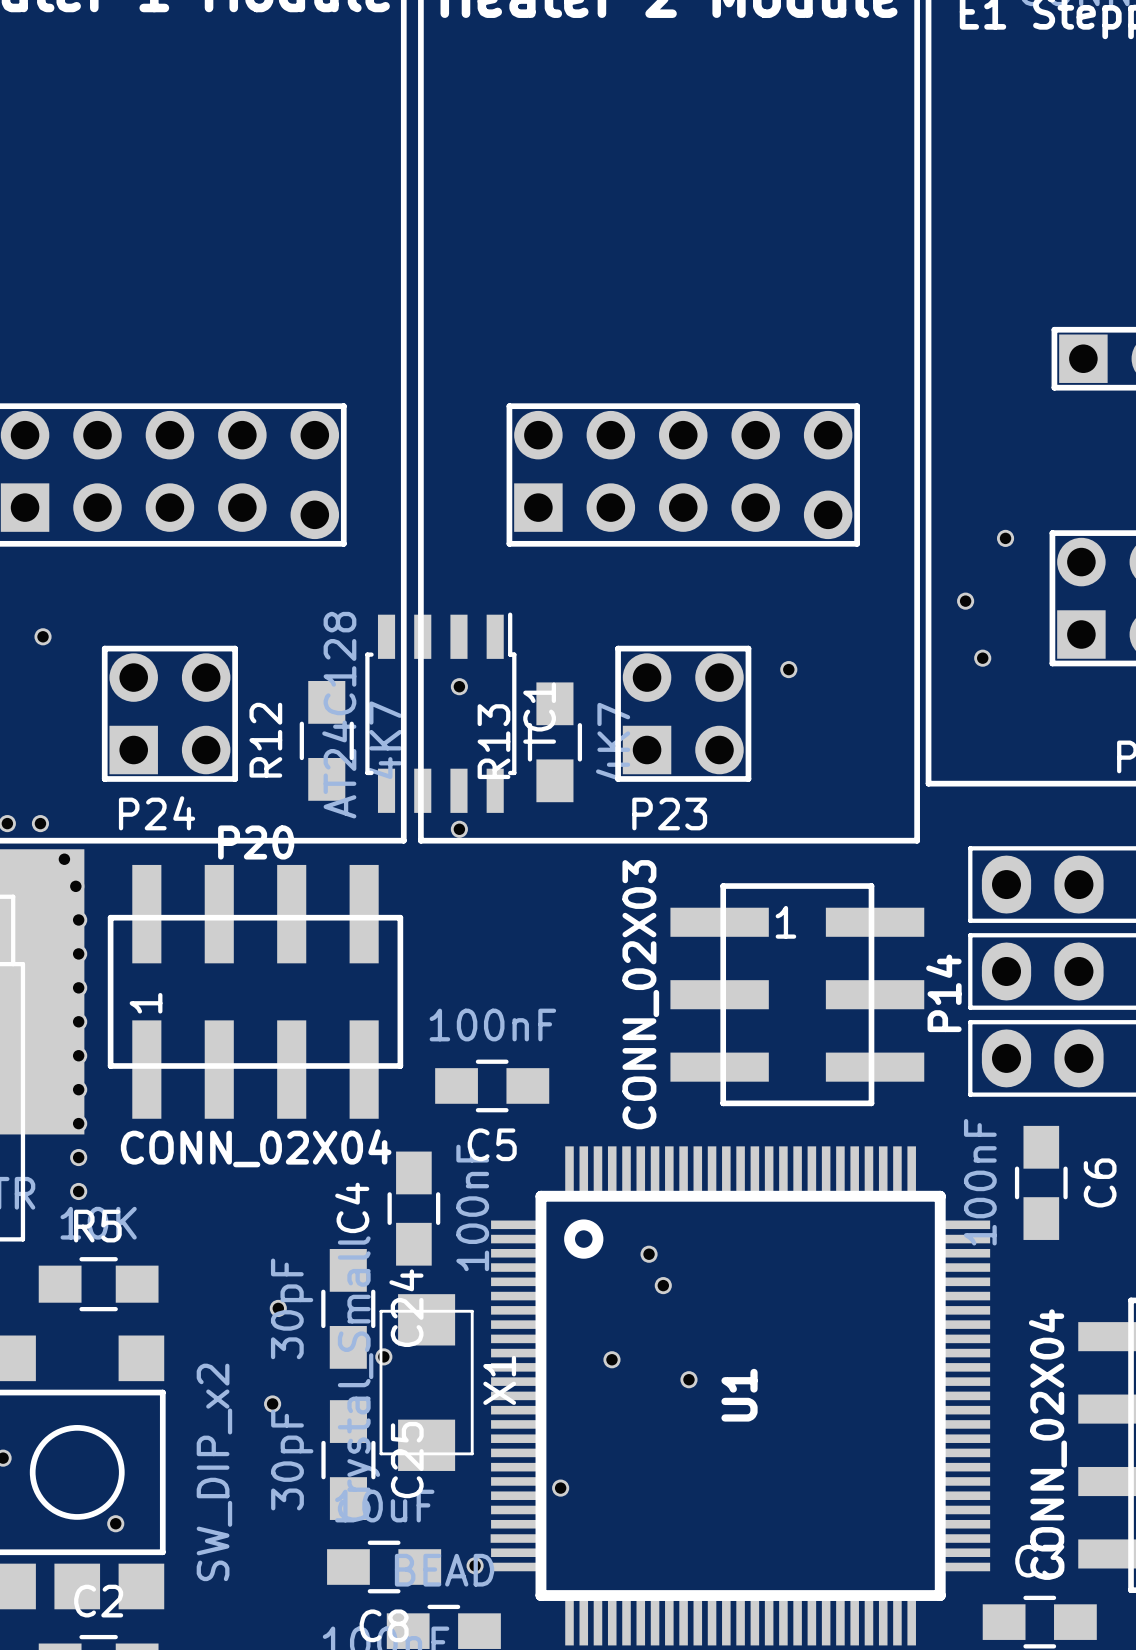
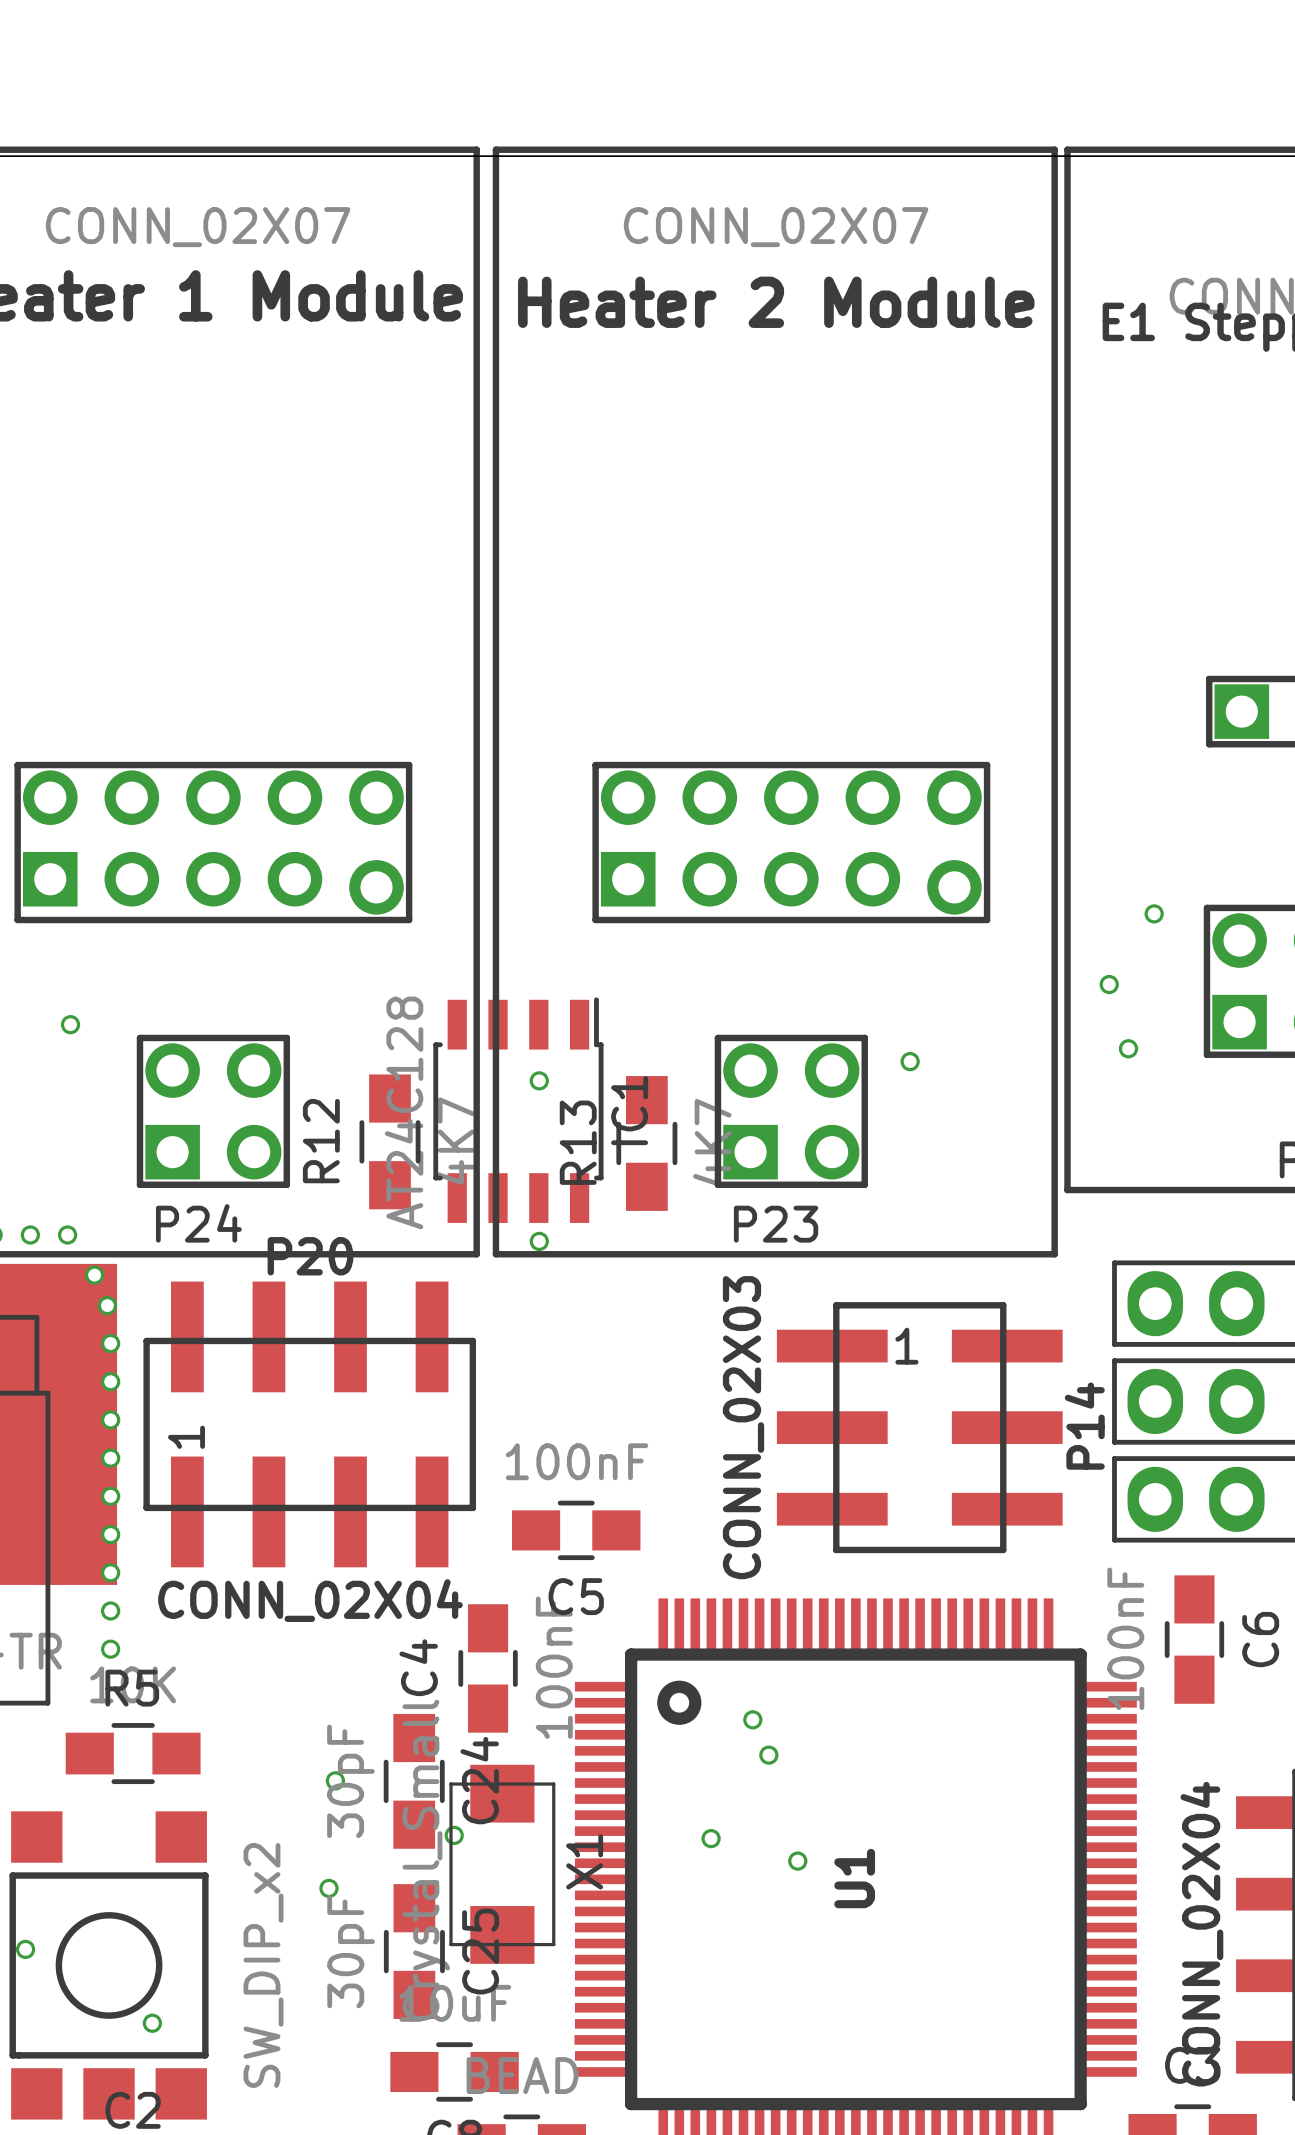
part: (560, 1488) -> none
part: (475, 1565) -> none

